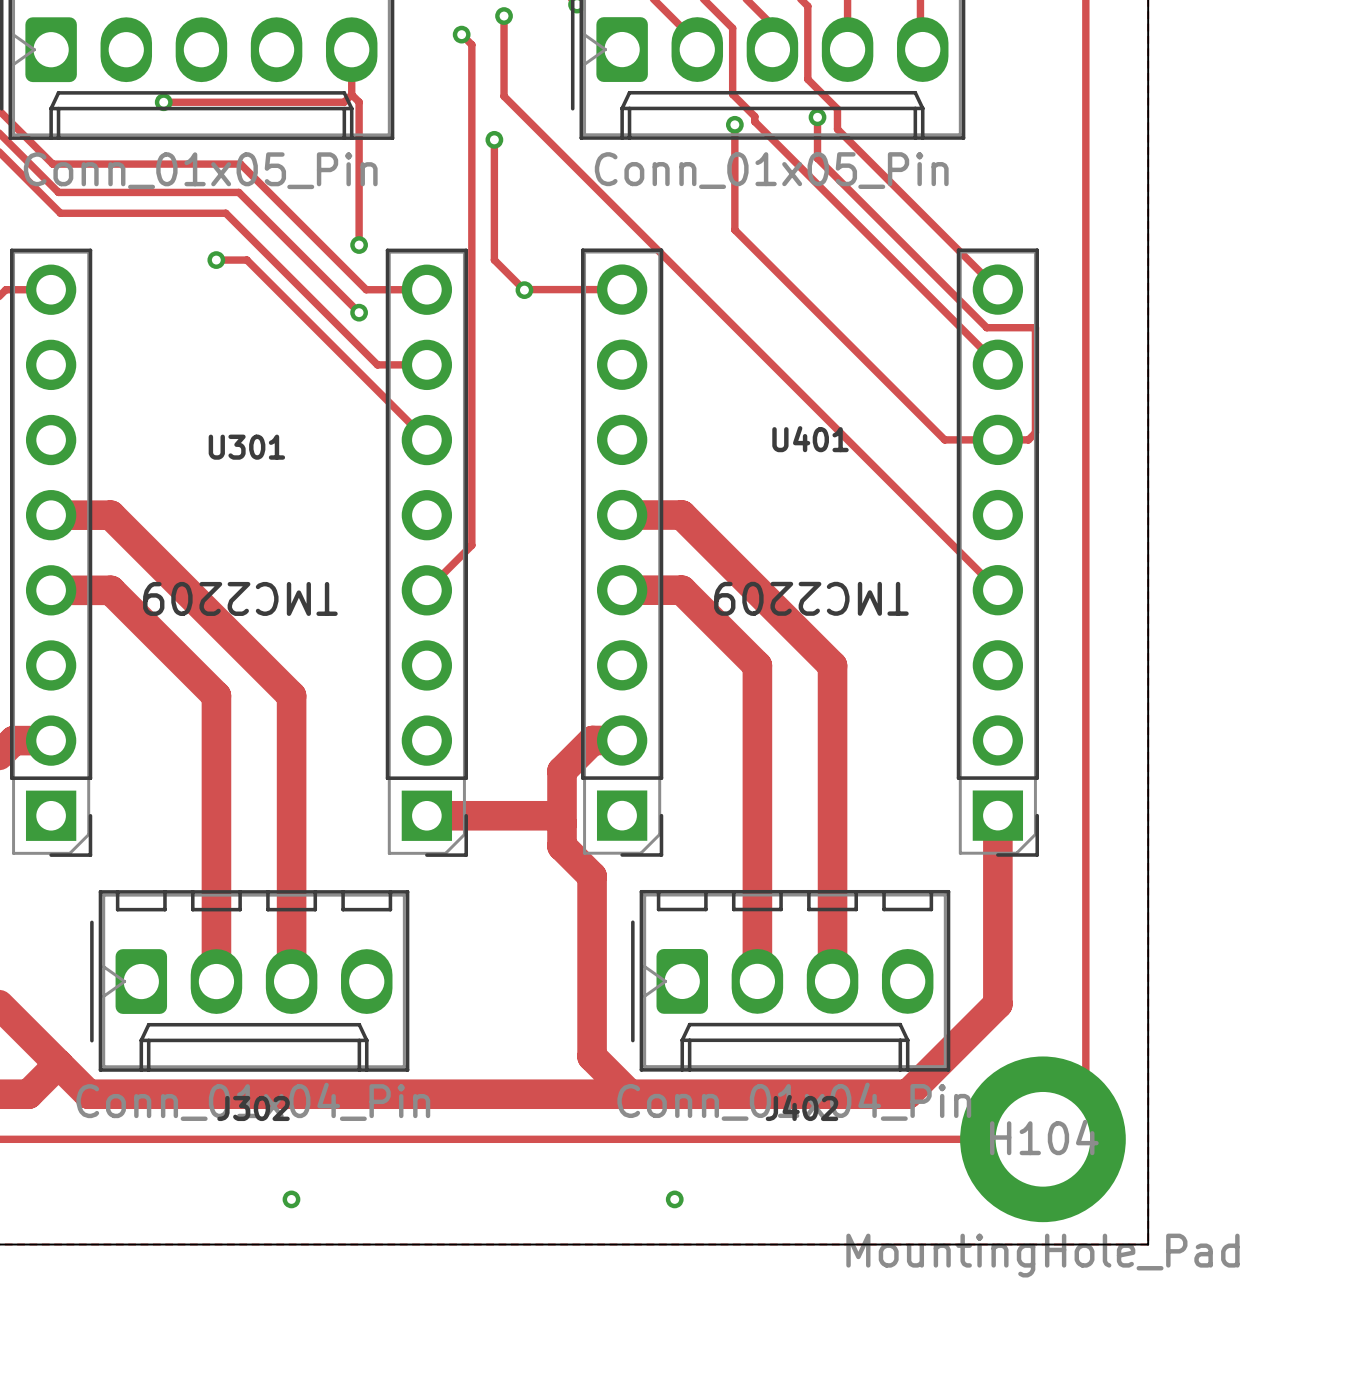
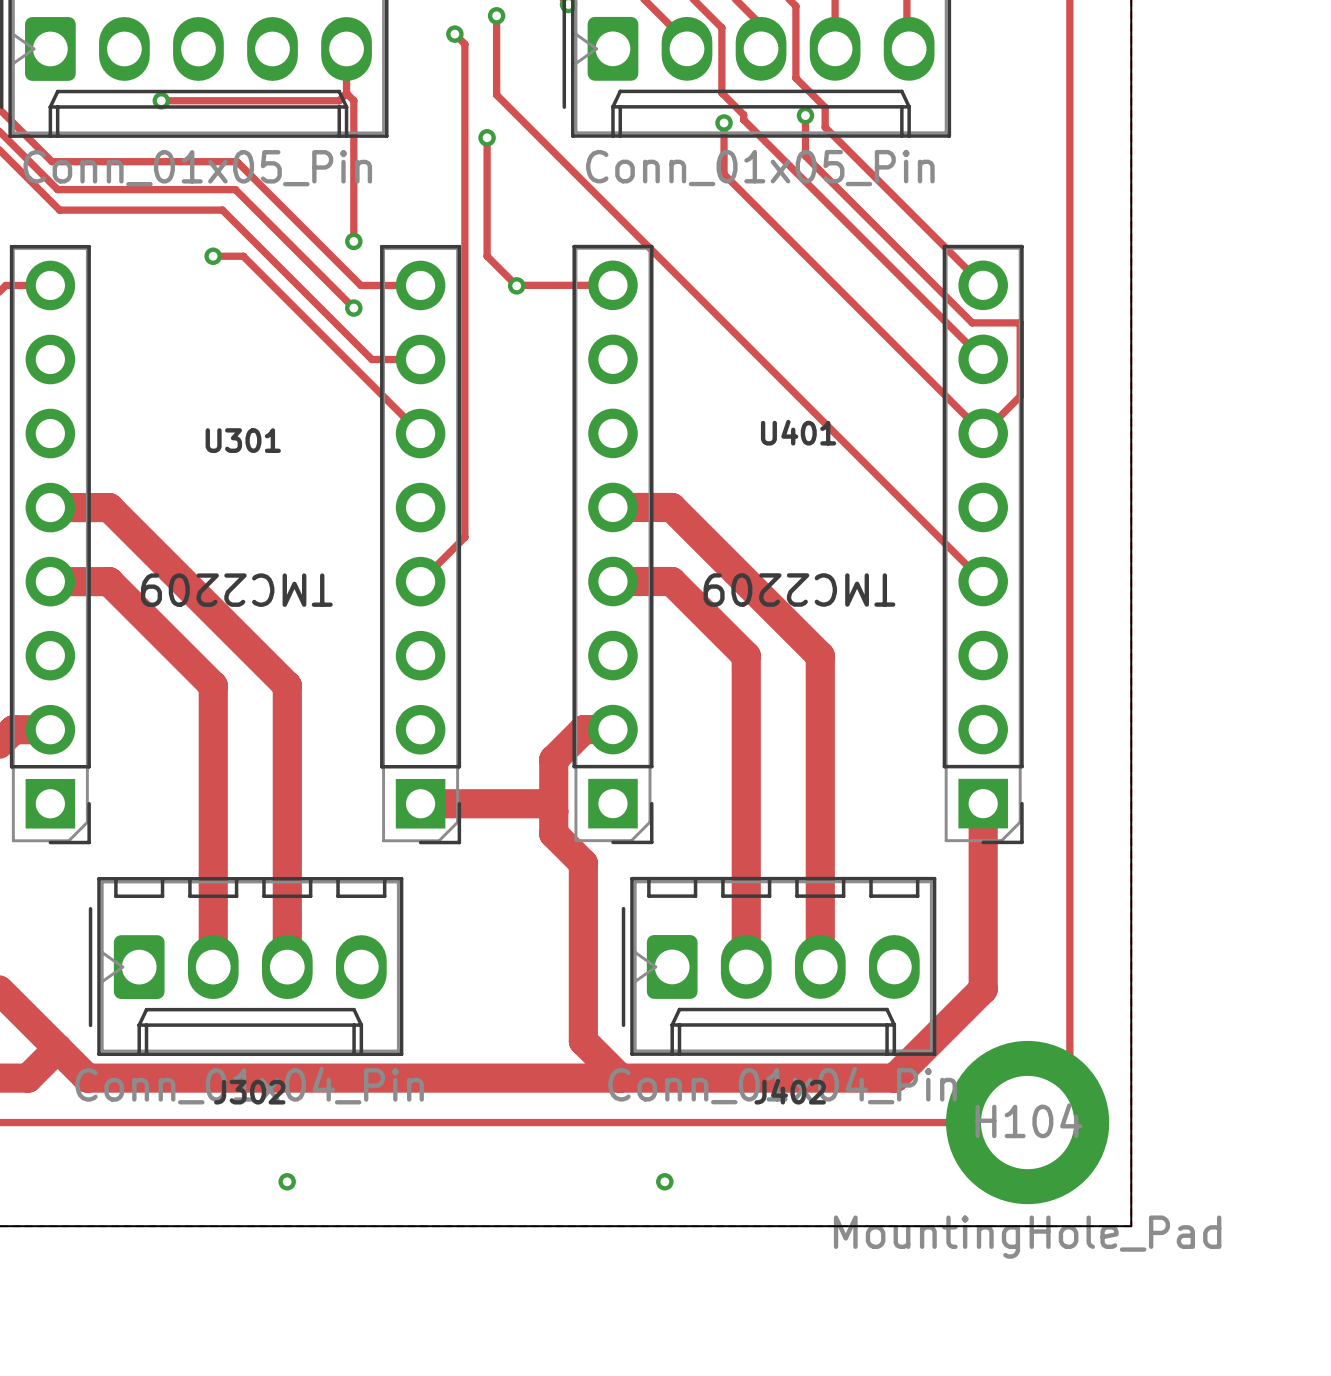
track: (734, 176) (734, 230) (944, 439) (1028, 439) (1035, 432) (1035, 402) -> (724, 174) (983, 433) (1020, 396)

